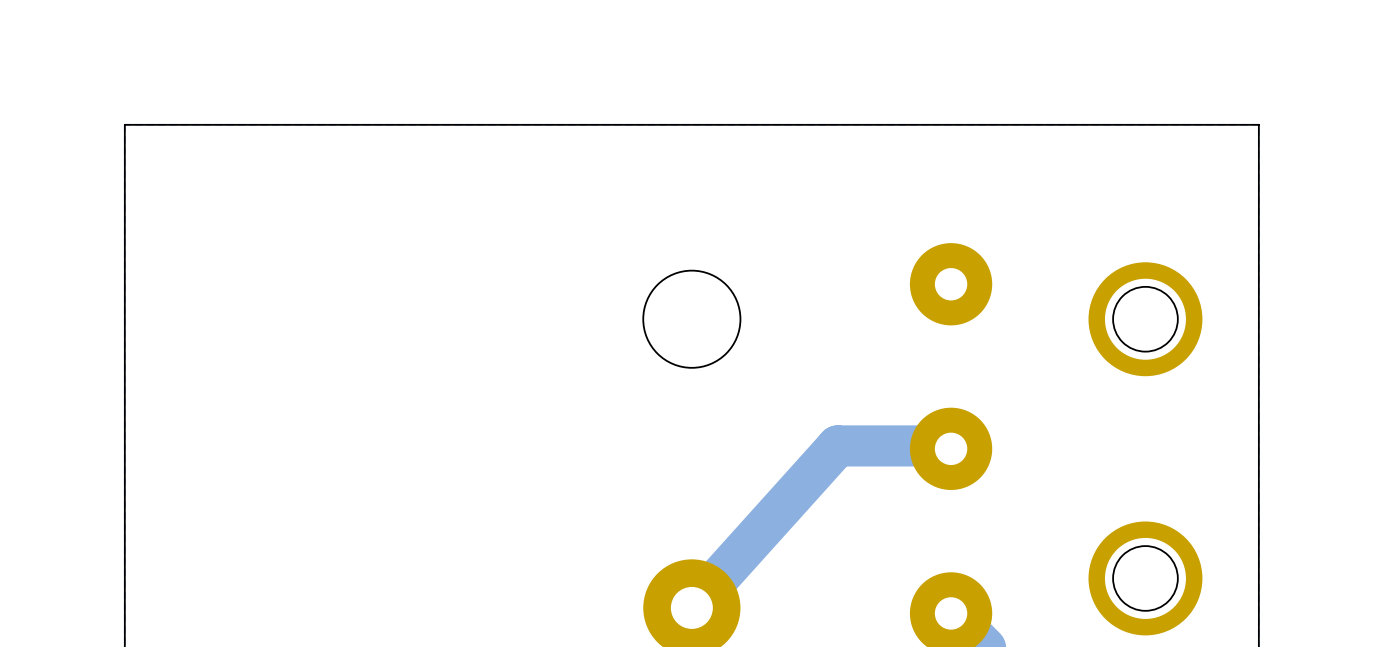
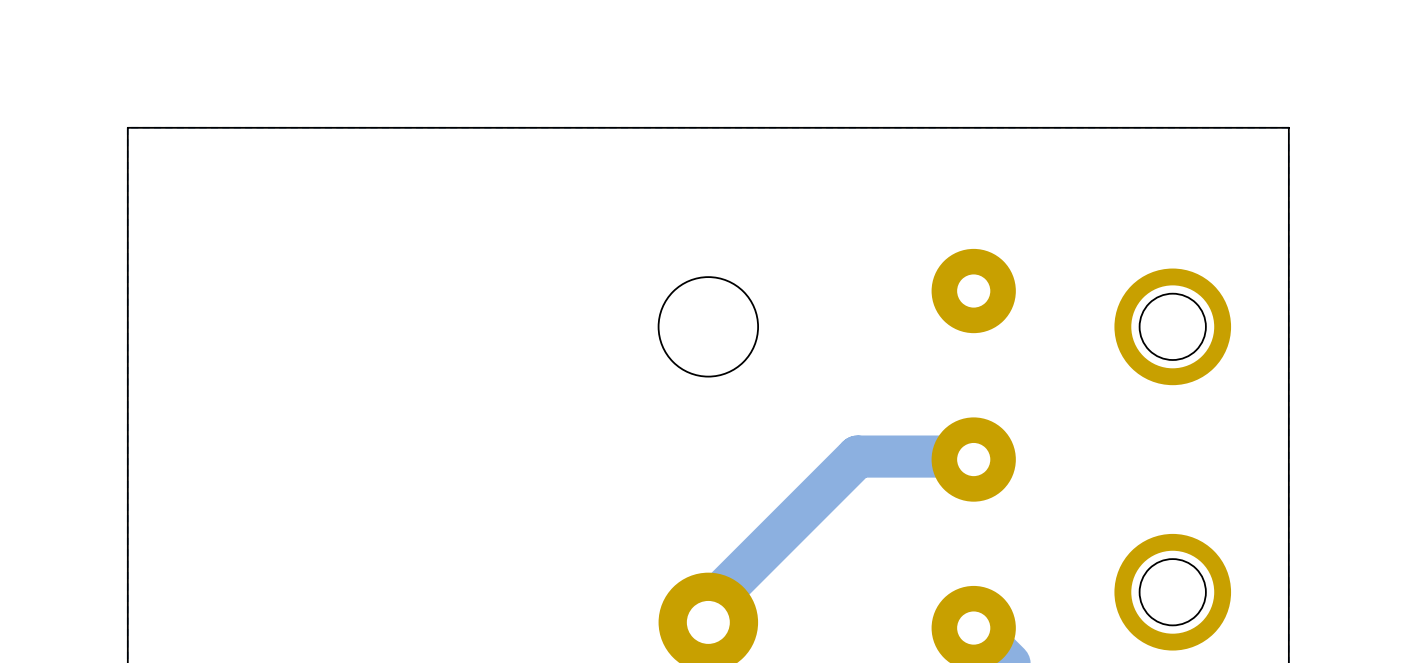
track: (837, 445) (691, 607) -> (857, 456) (691, 622)

